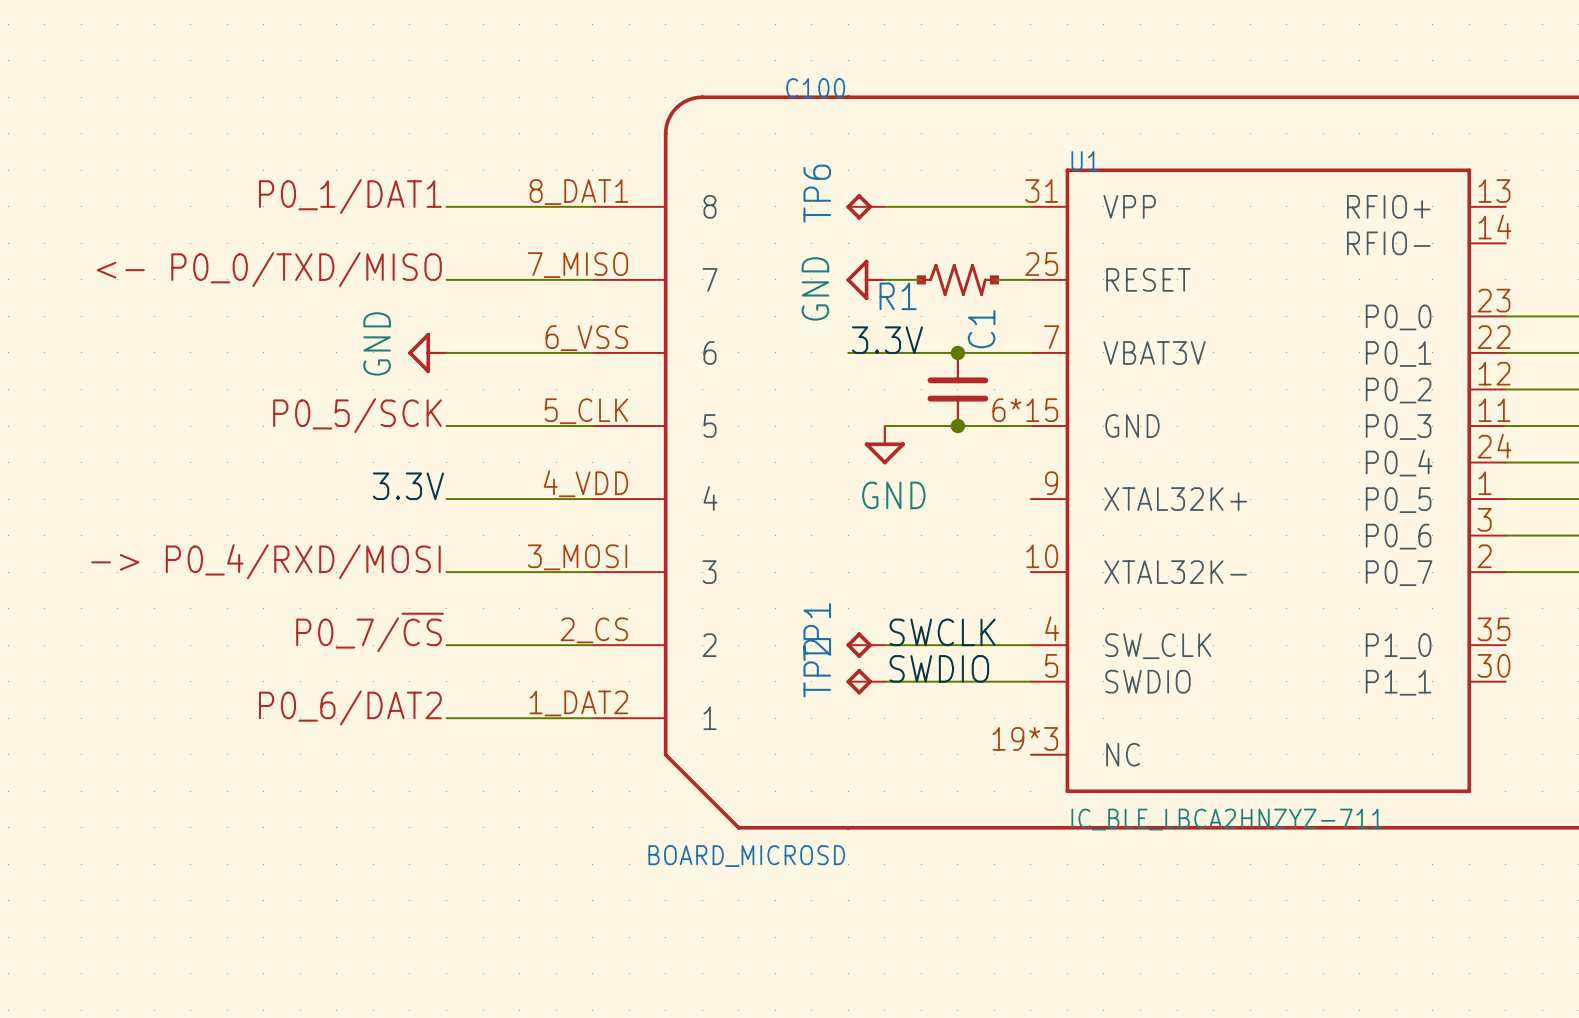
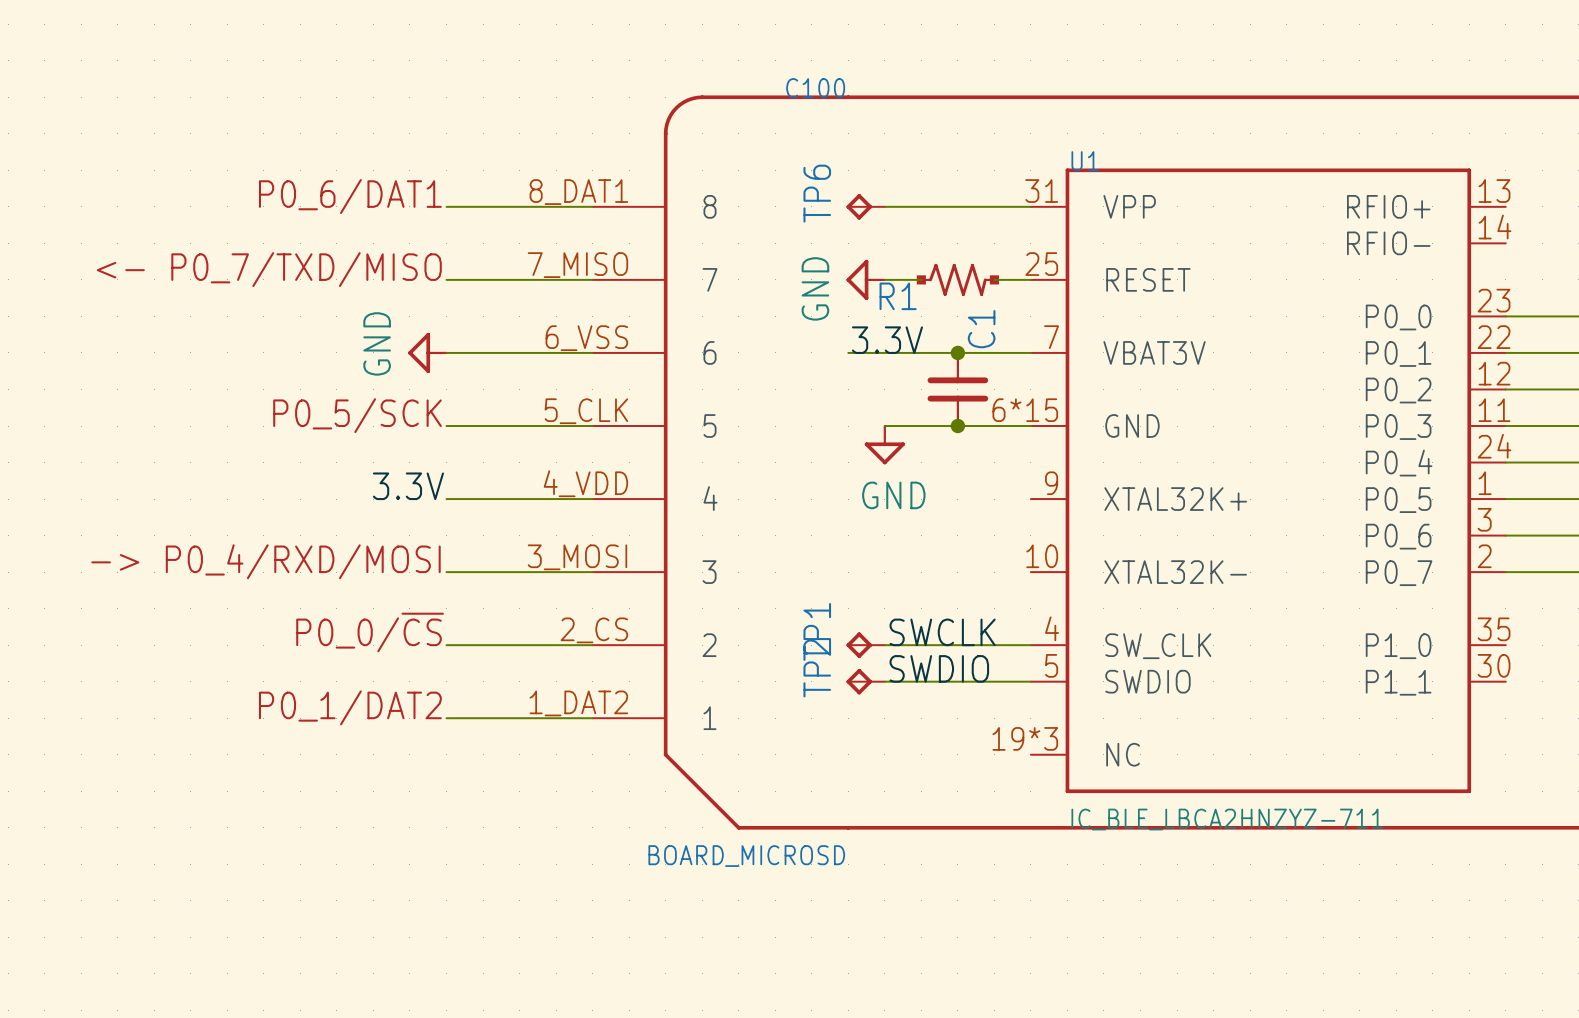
text: P0_1/DAT1 (350, 196) -> P0_6/DAT1 (350, 196)
text: <- P0_0/TXD/MISO (269, 269) -> <- P0_7/TXD/MISO (269, 269)
text: P0_7/~{CS} (370, 632) -> P0_0/~{CS} (370, 632)
text: P0_6/DAT2 (350, 707) -> P0_1/DAT2 (350, 707)

